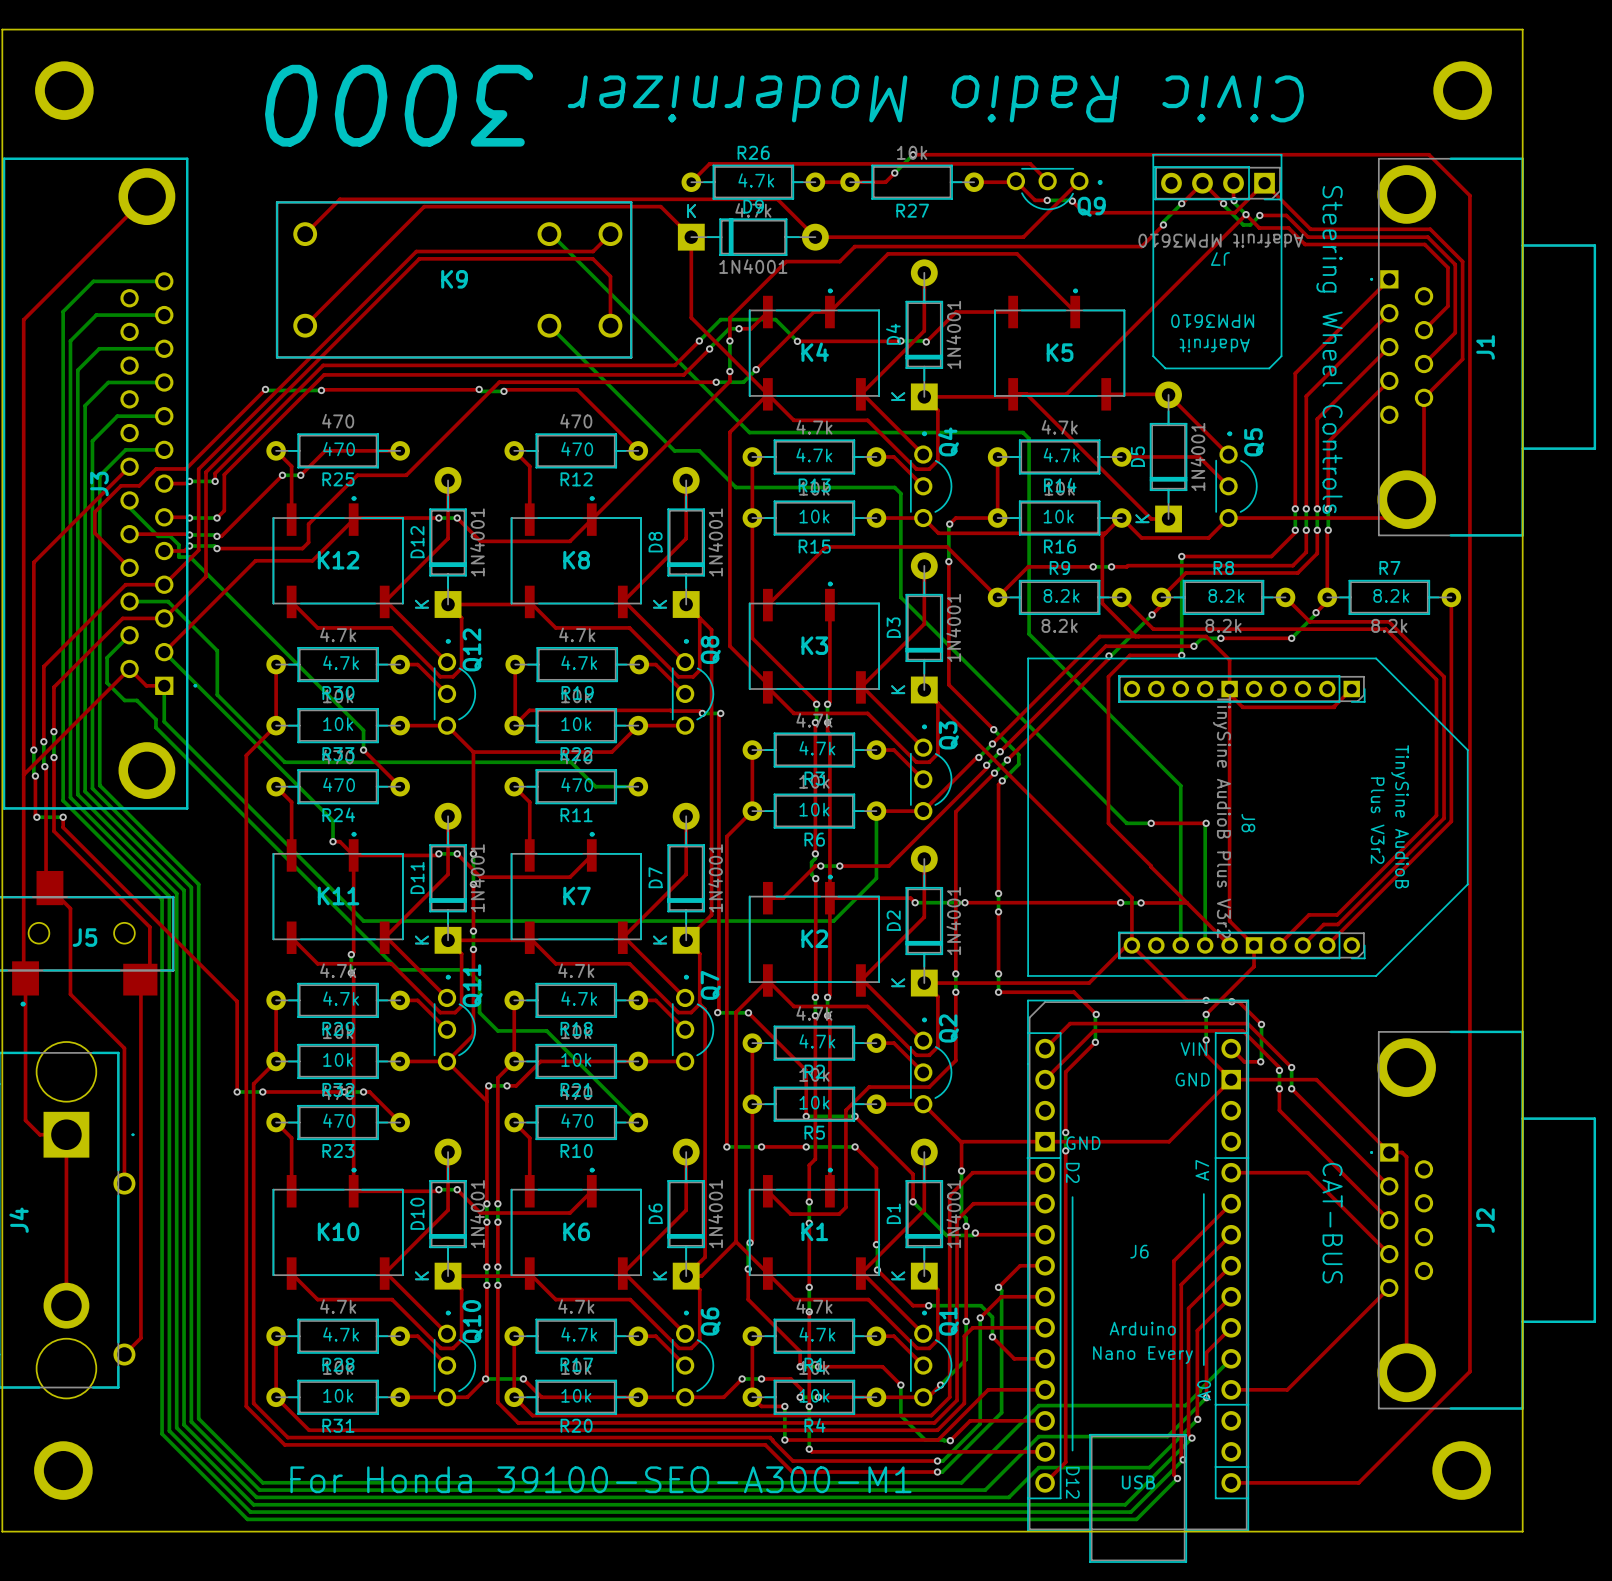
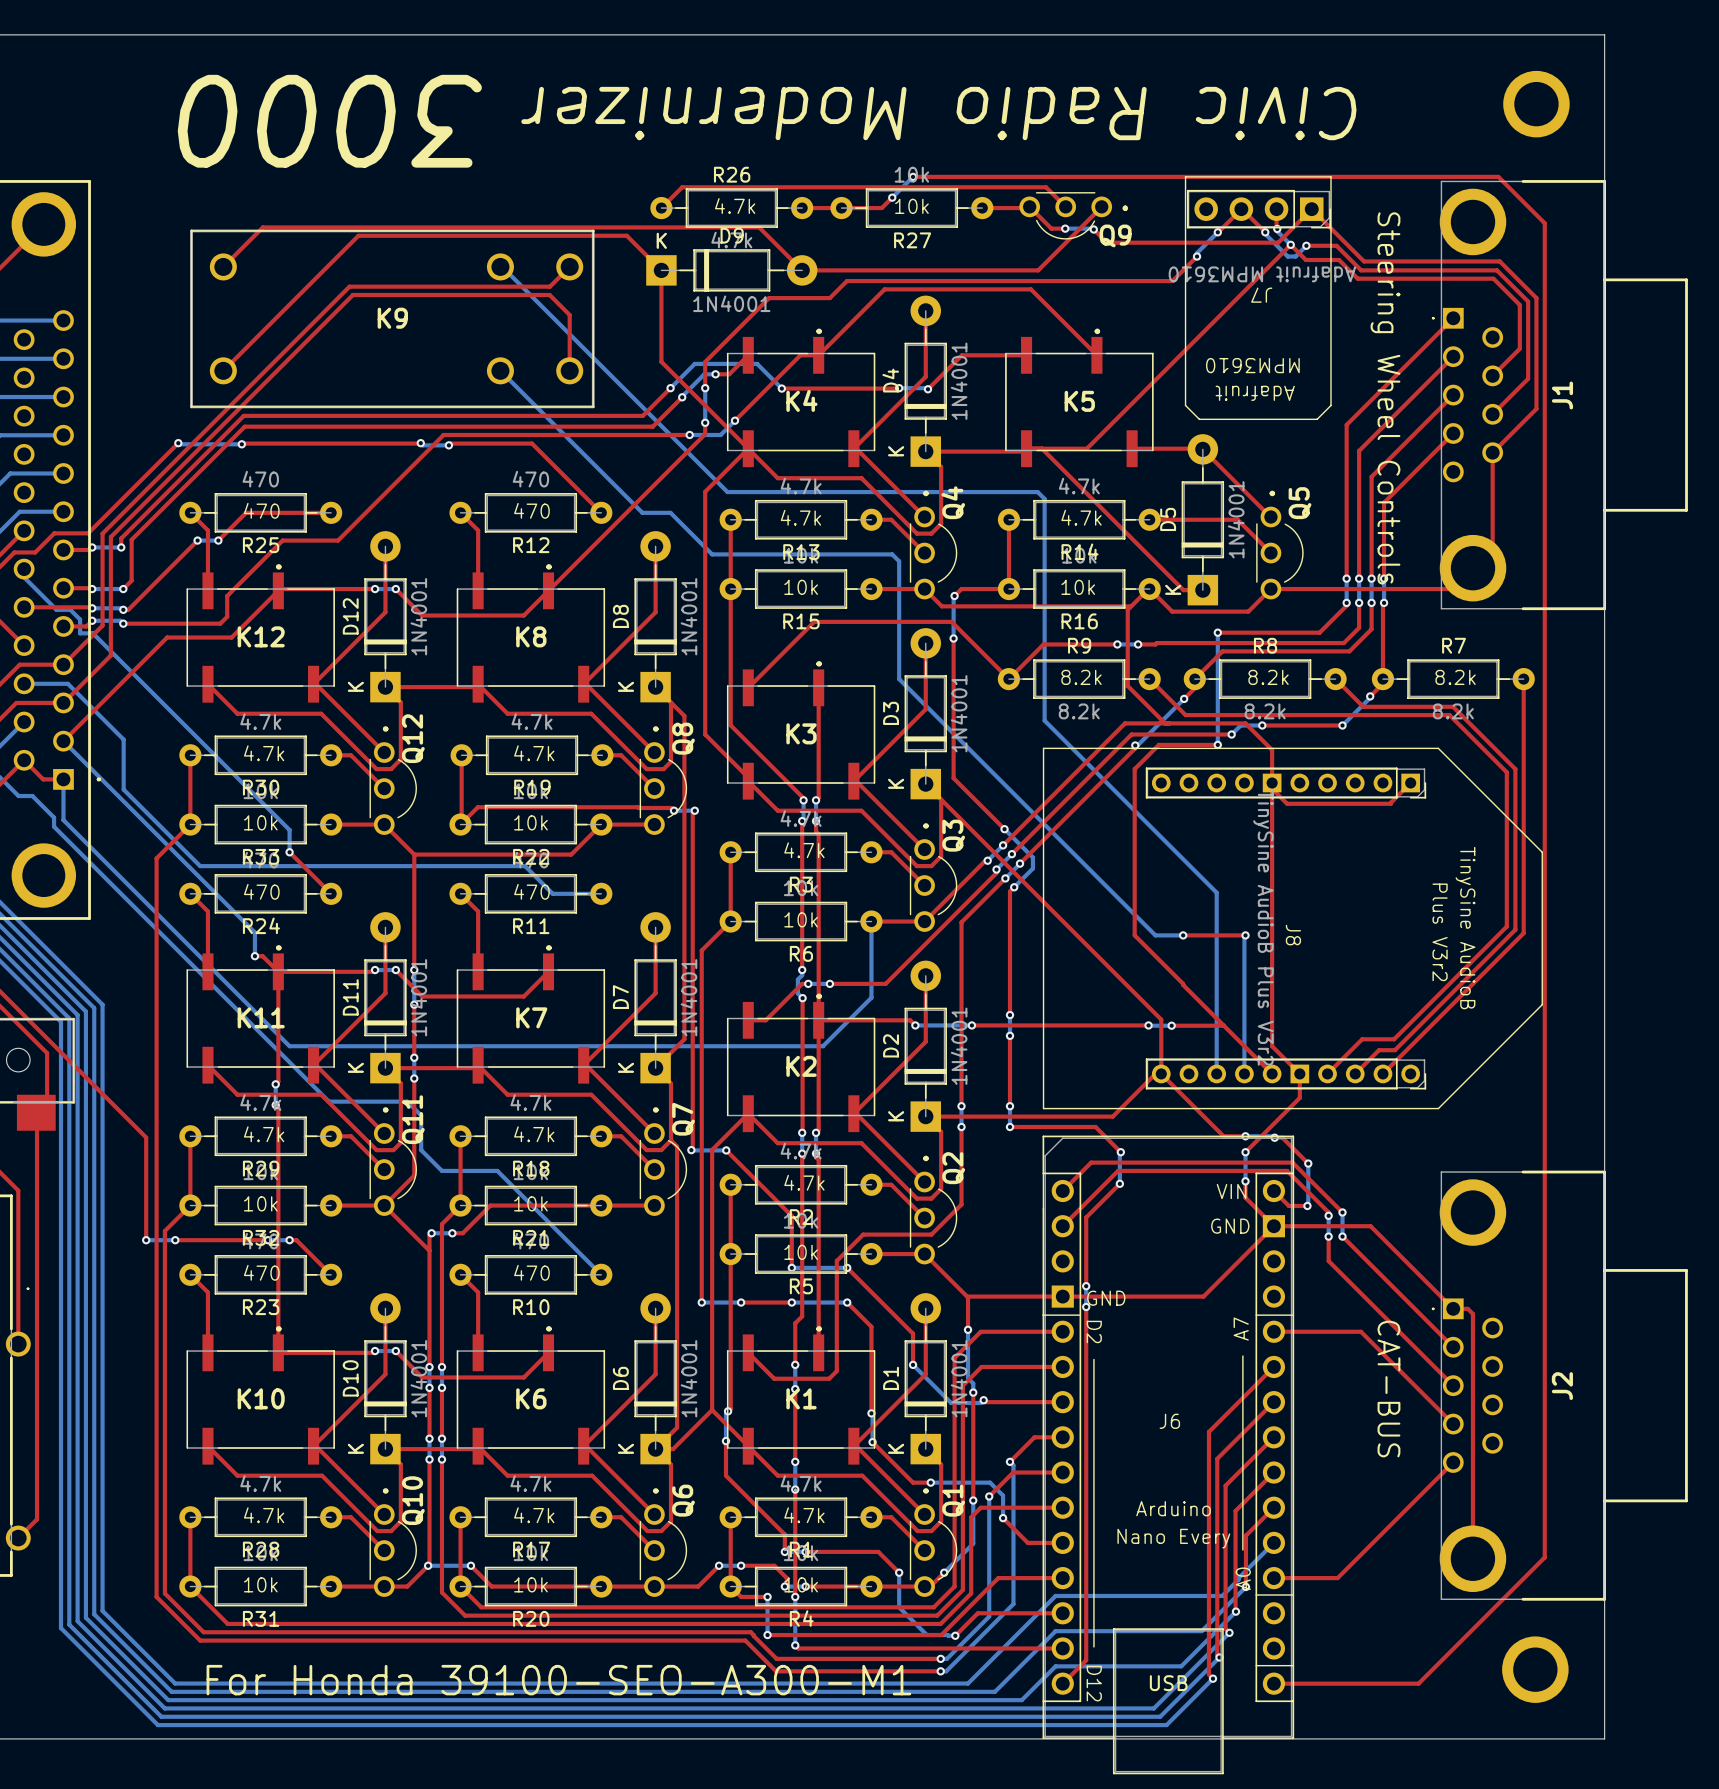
text: none -> 10k (911, 206)

